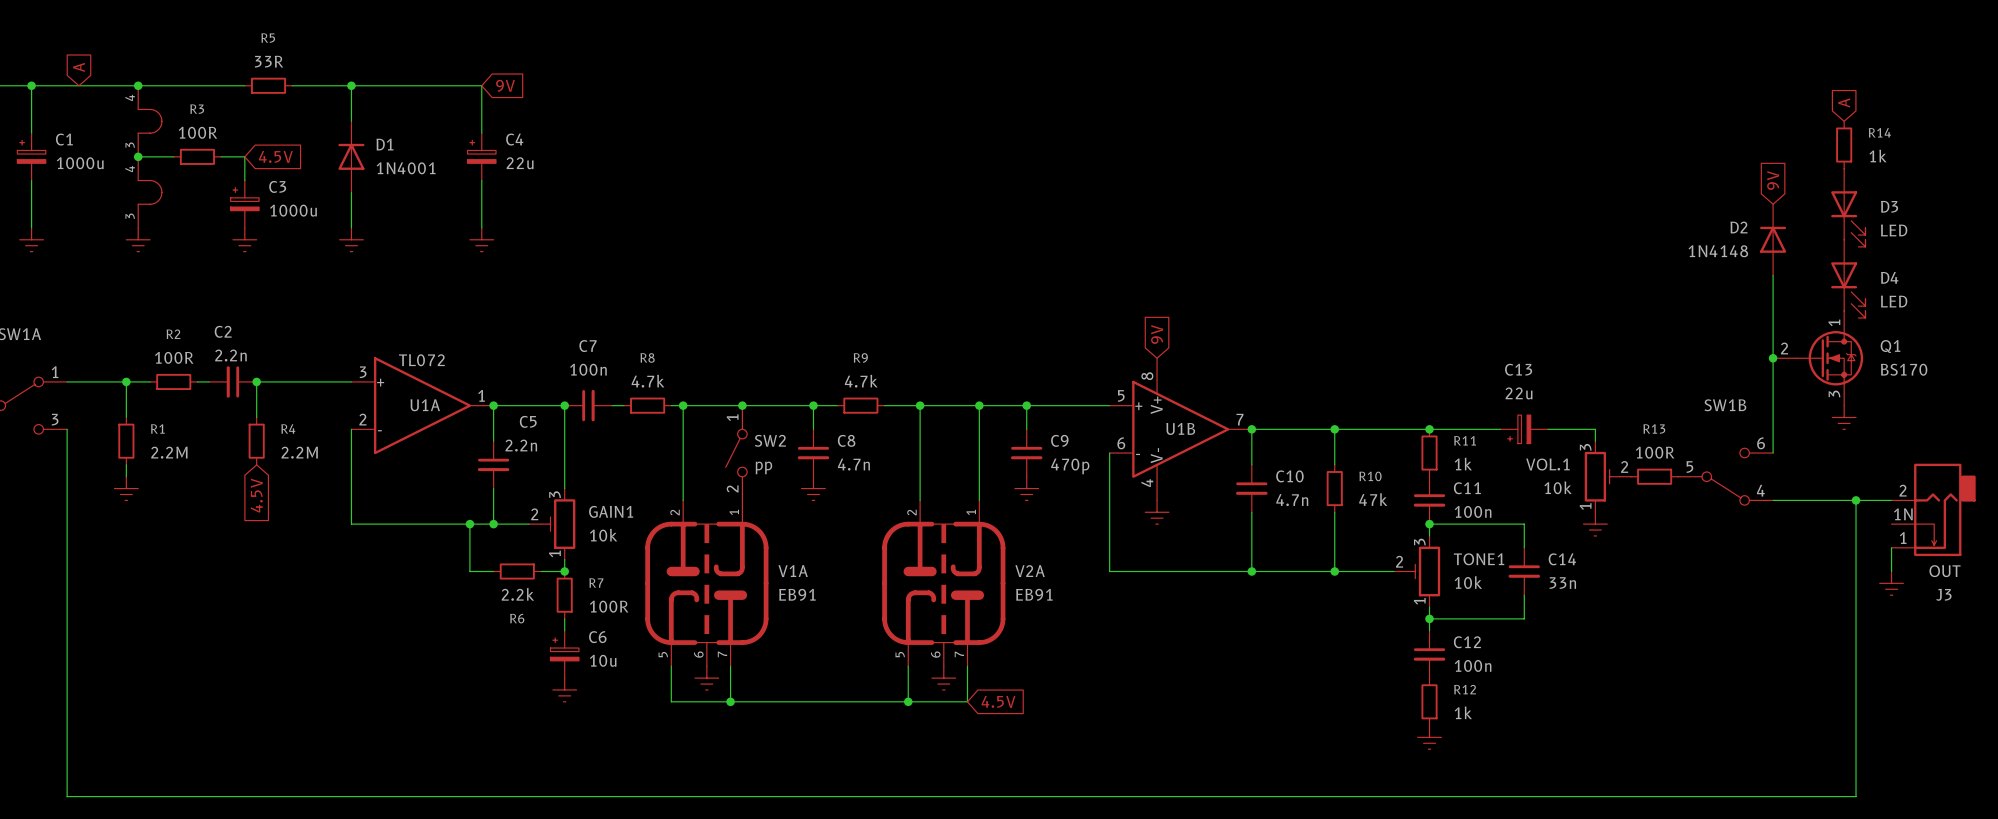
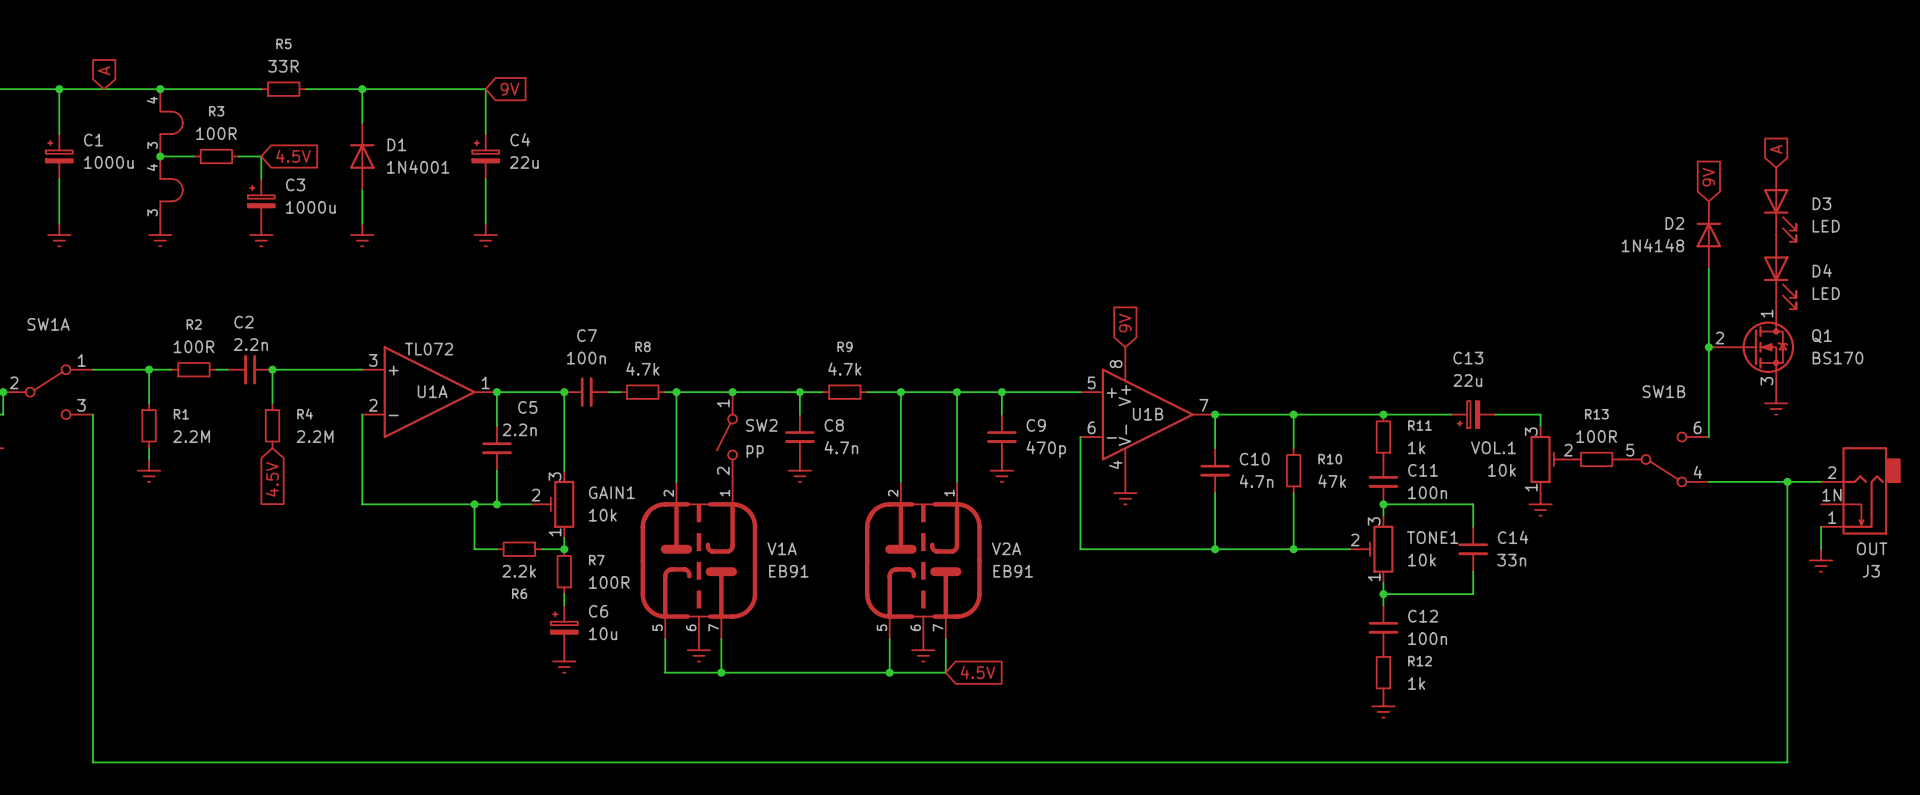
global label position: A (1844, 102) -> A (1776, 149)
R14: 1k (1844, 145) -> none

